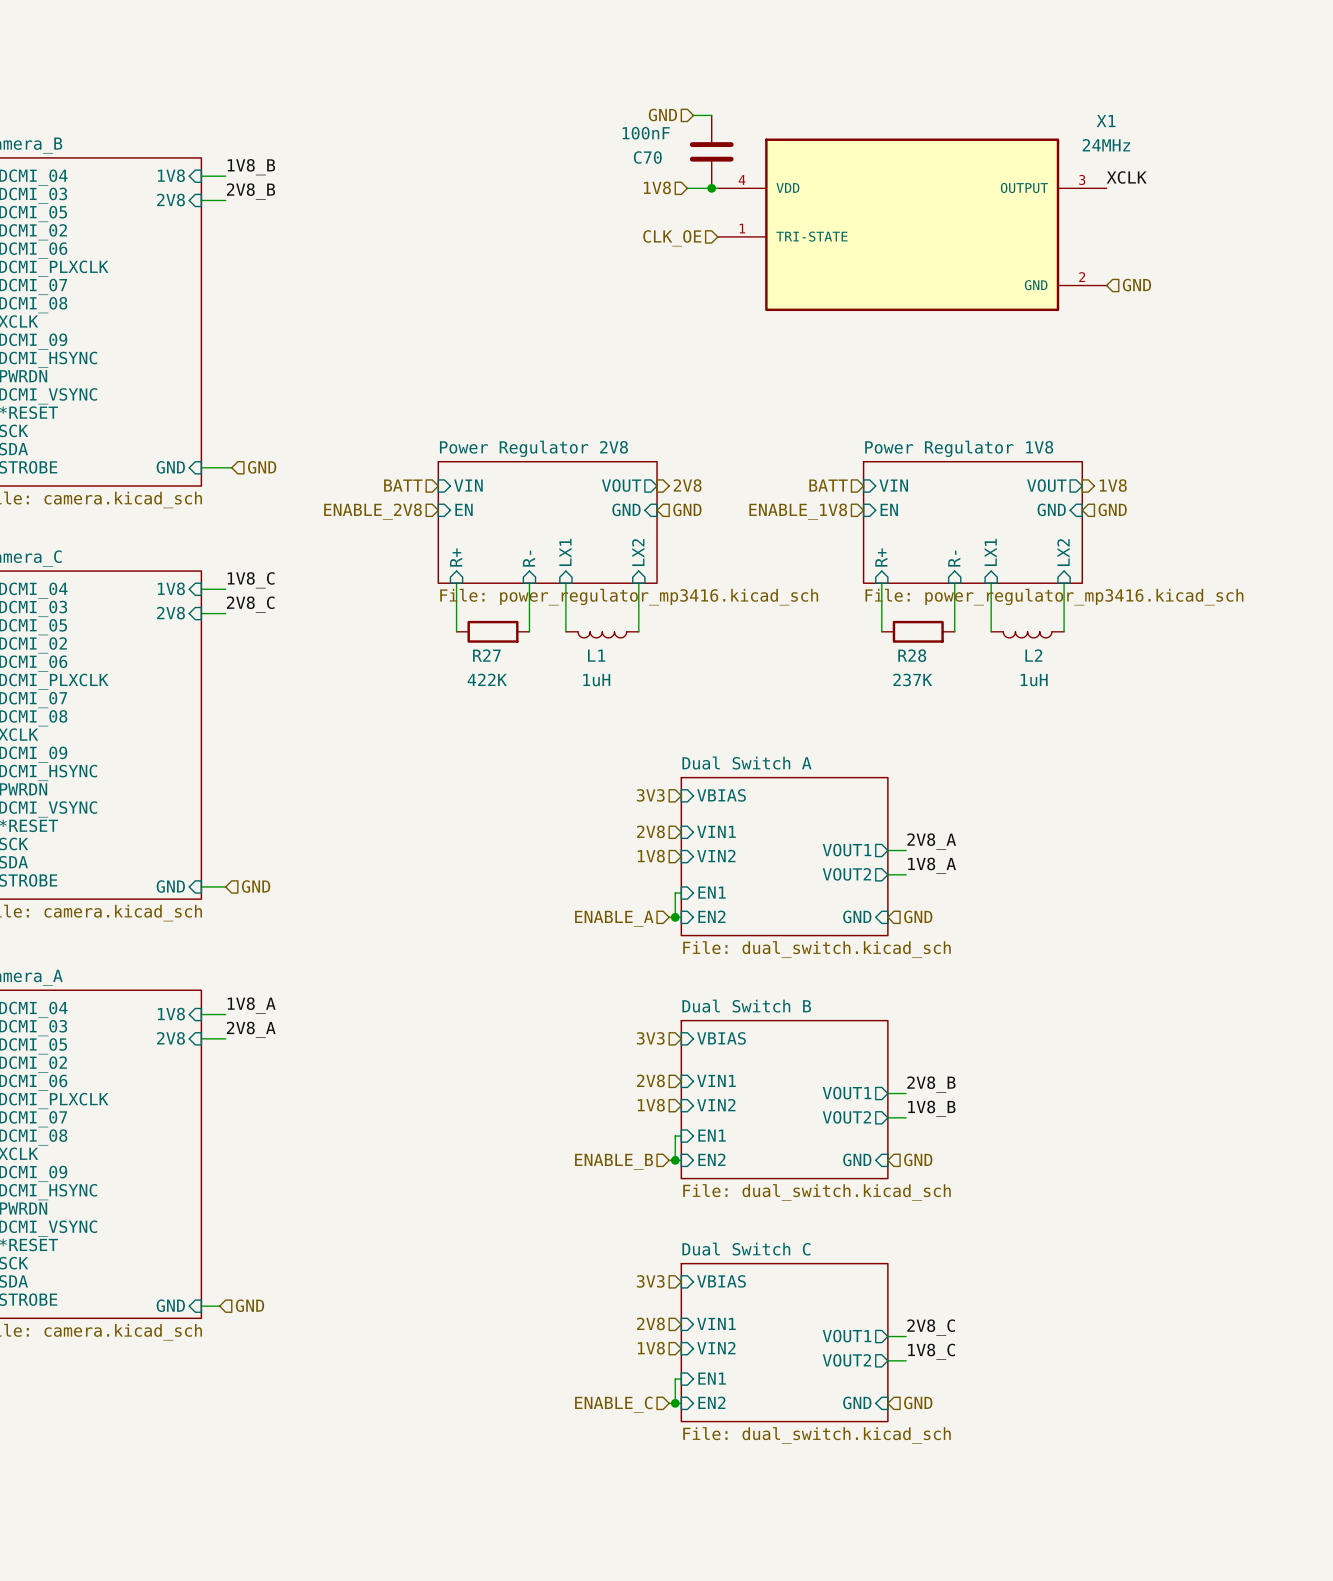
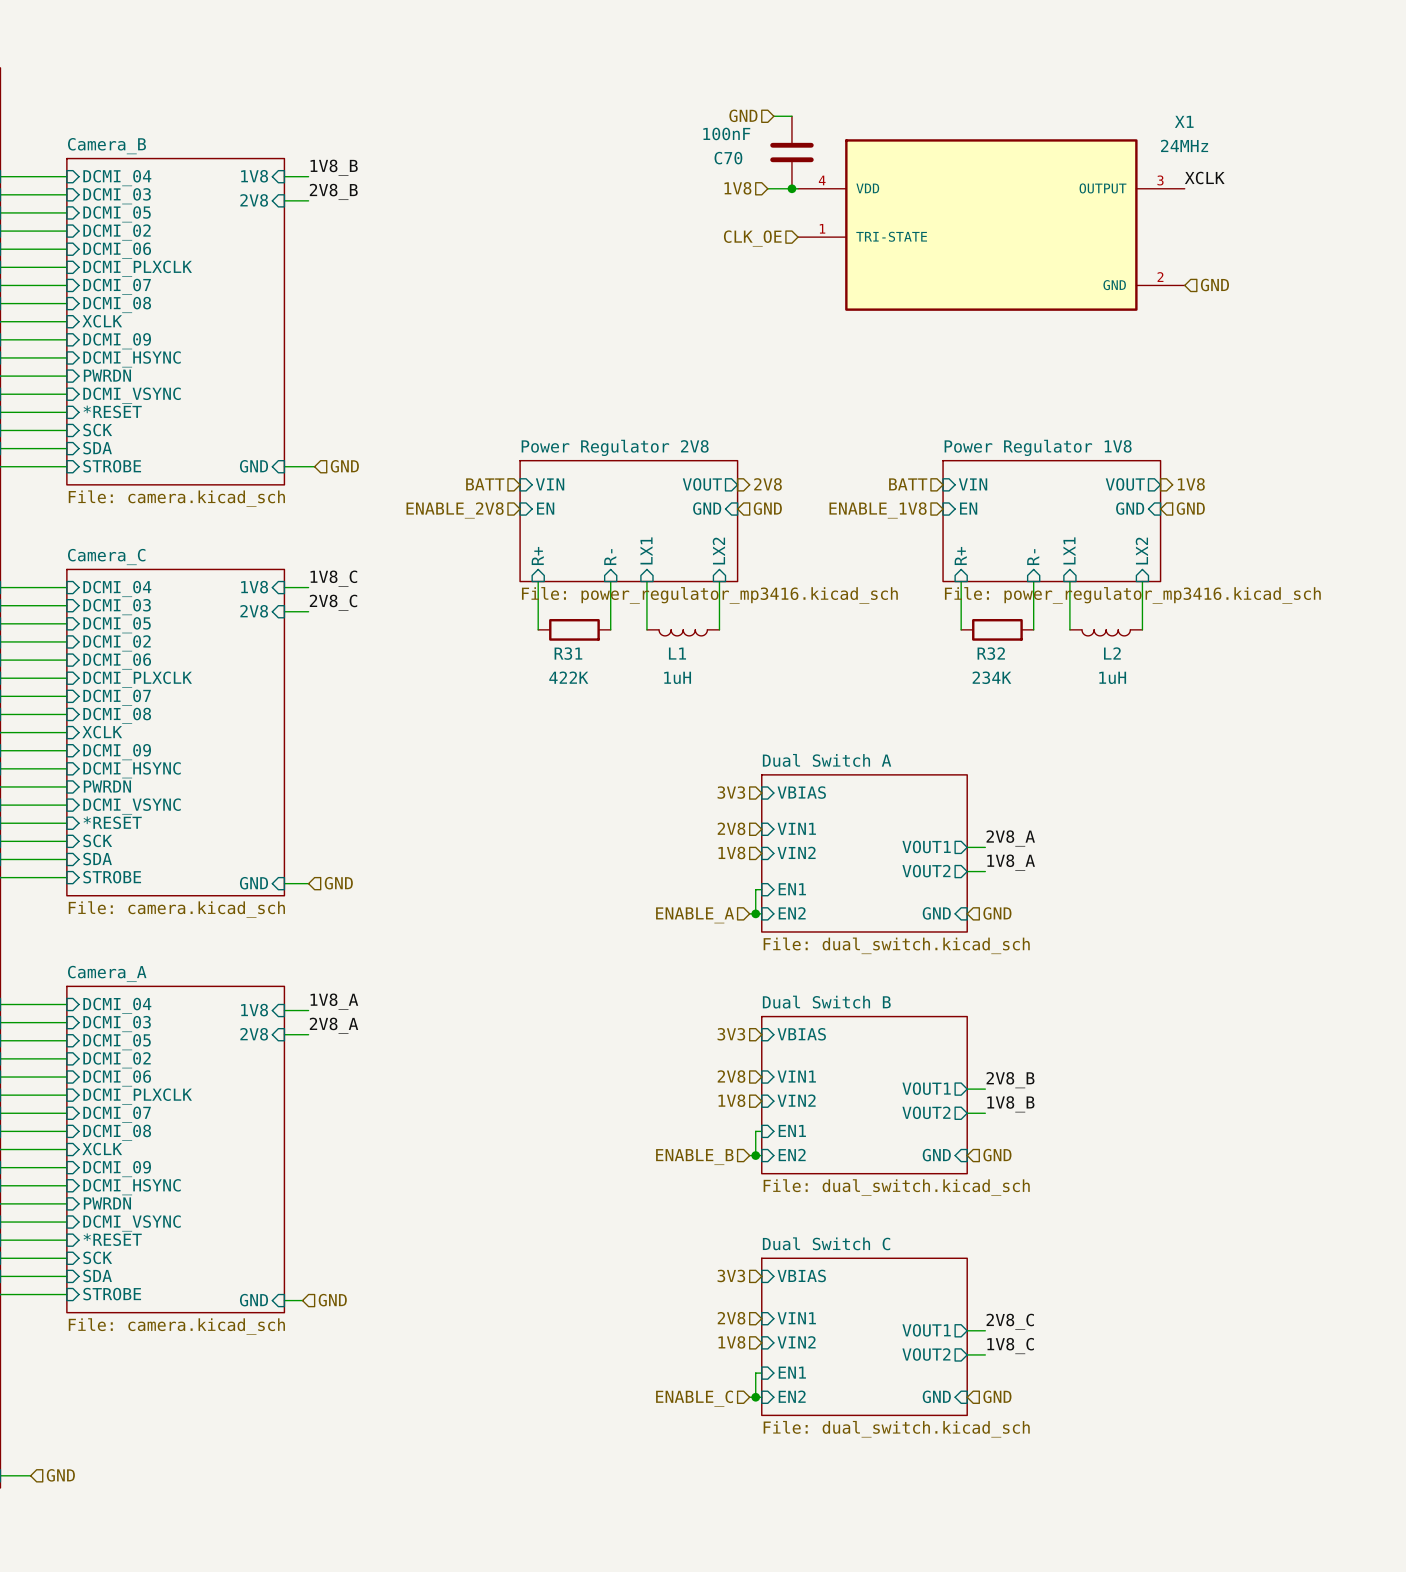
R27 name: R27 (486, 655) -> R31 (568, 653)
R28 name: R28 (912, 655) -> R32 (991, 653)
R28 value: 237K (912, 679) -> 234K (991, 677)

